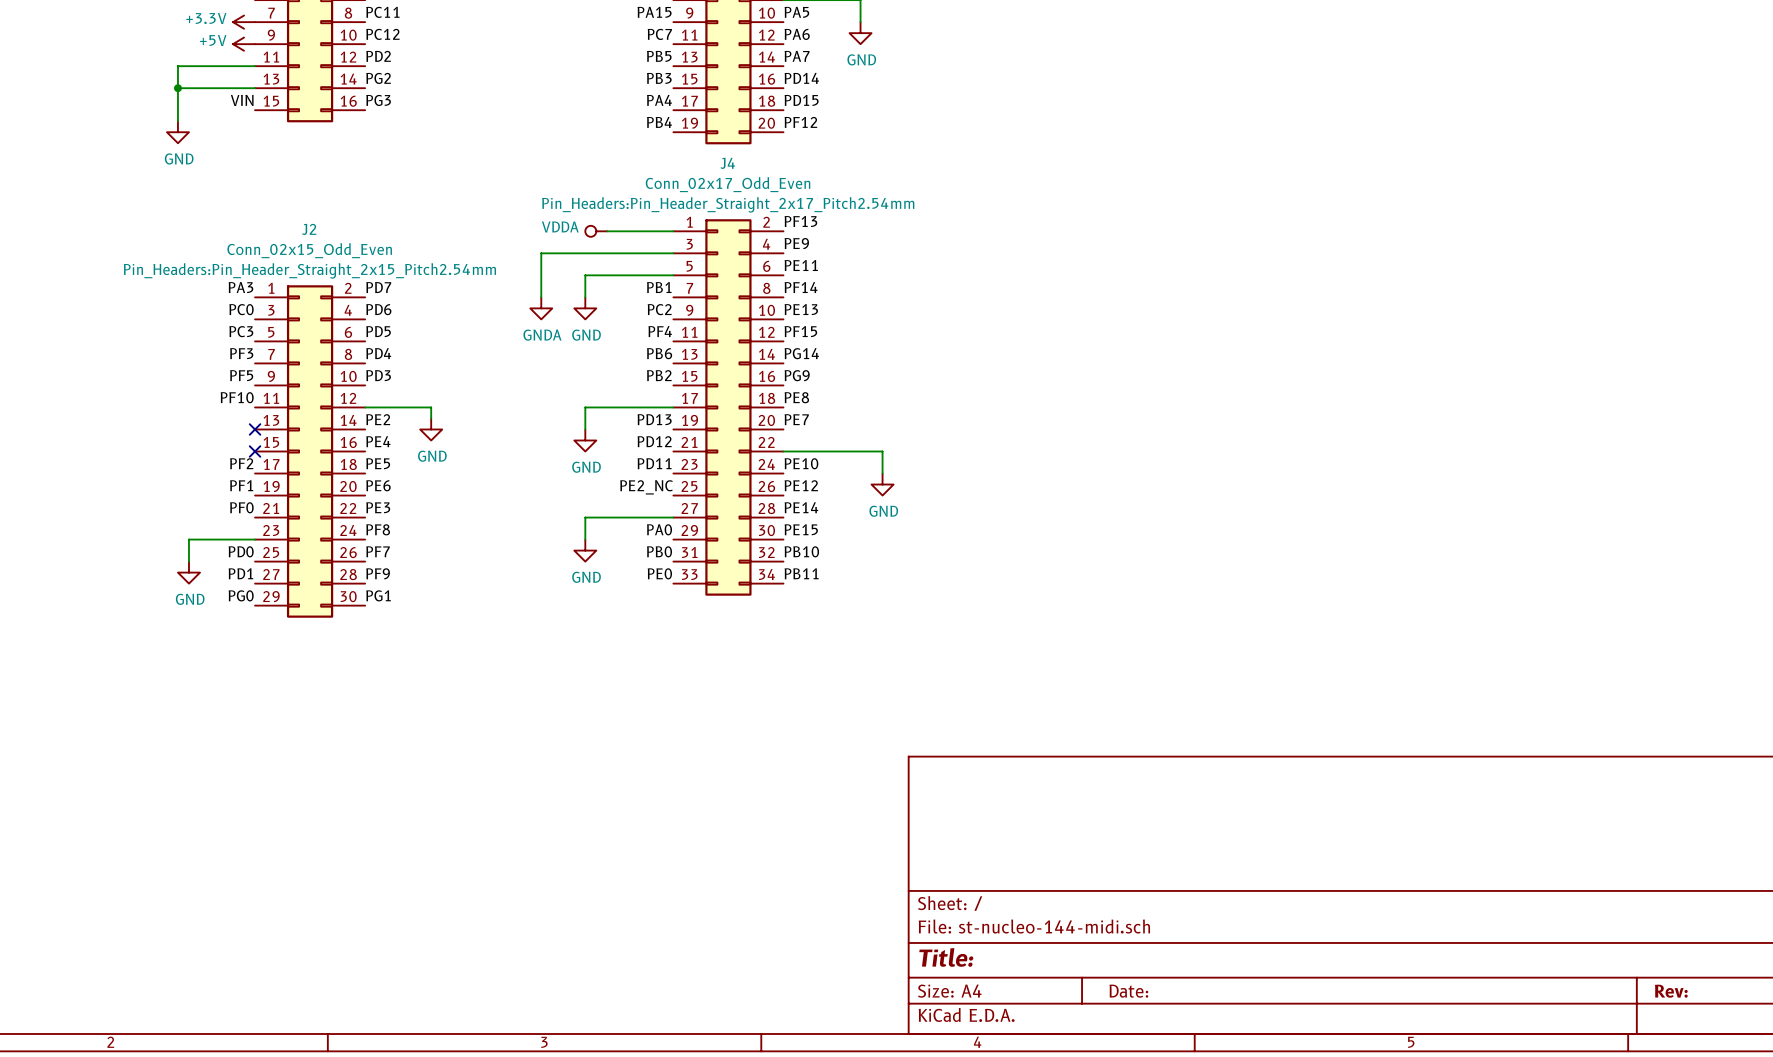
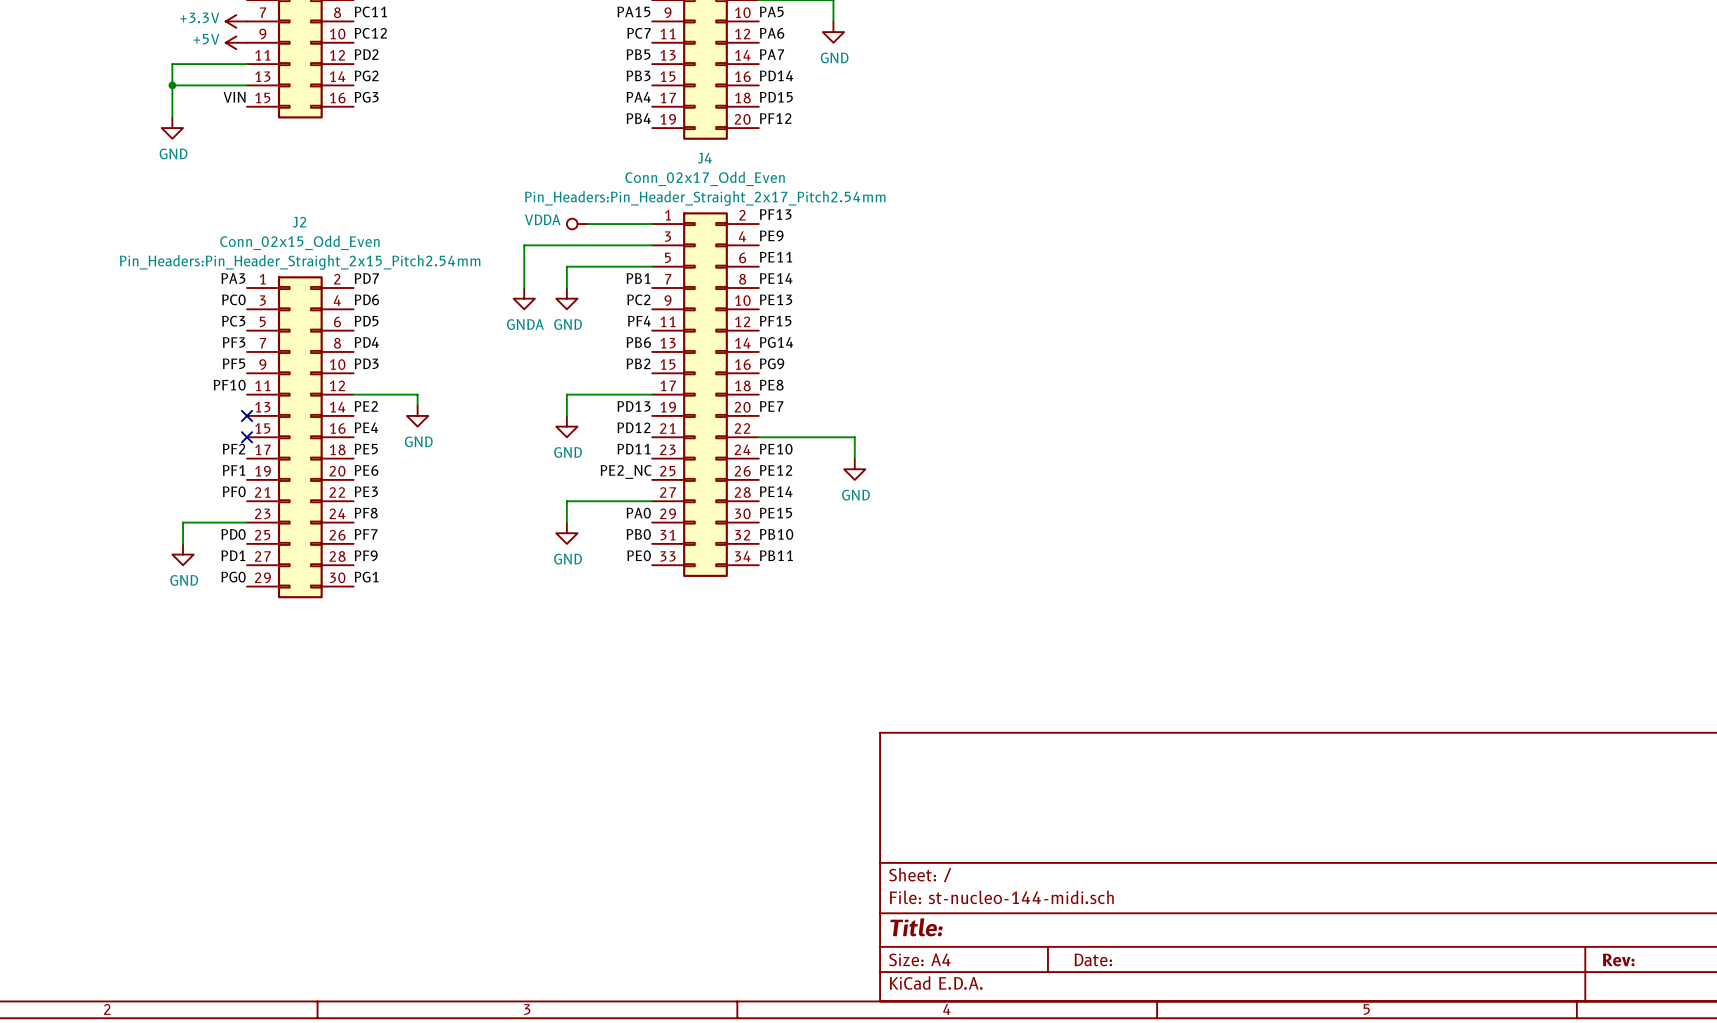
label: PF14 (801, 287) -> PE14 (776, 278)

